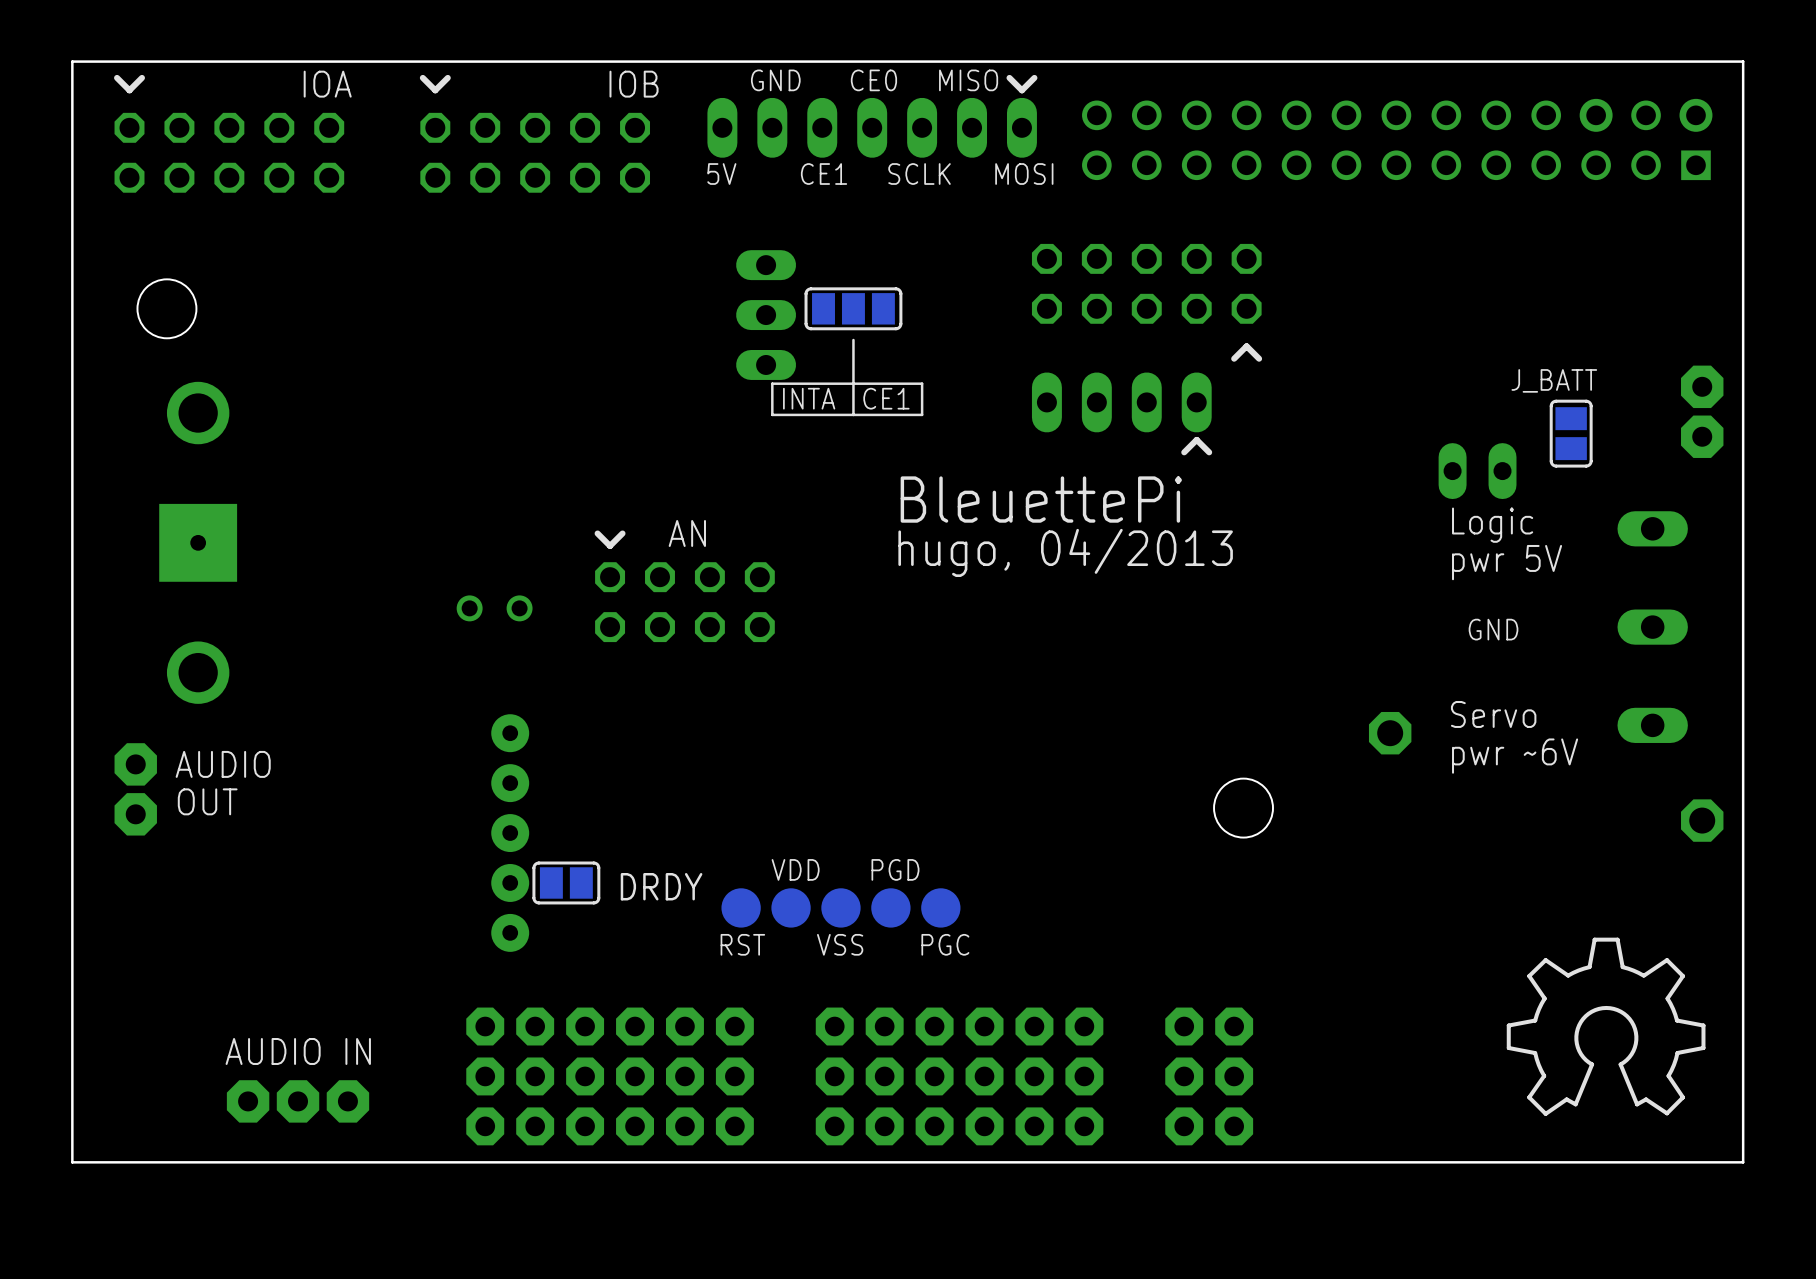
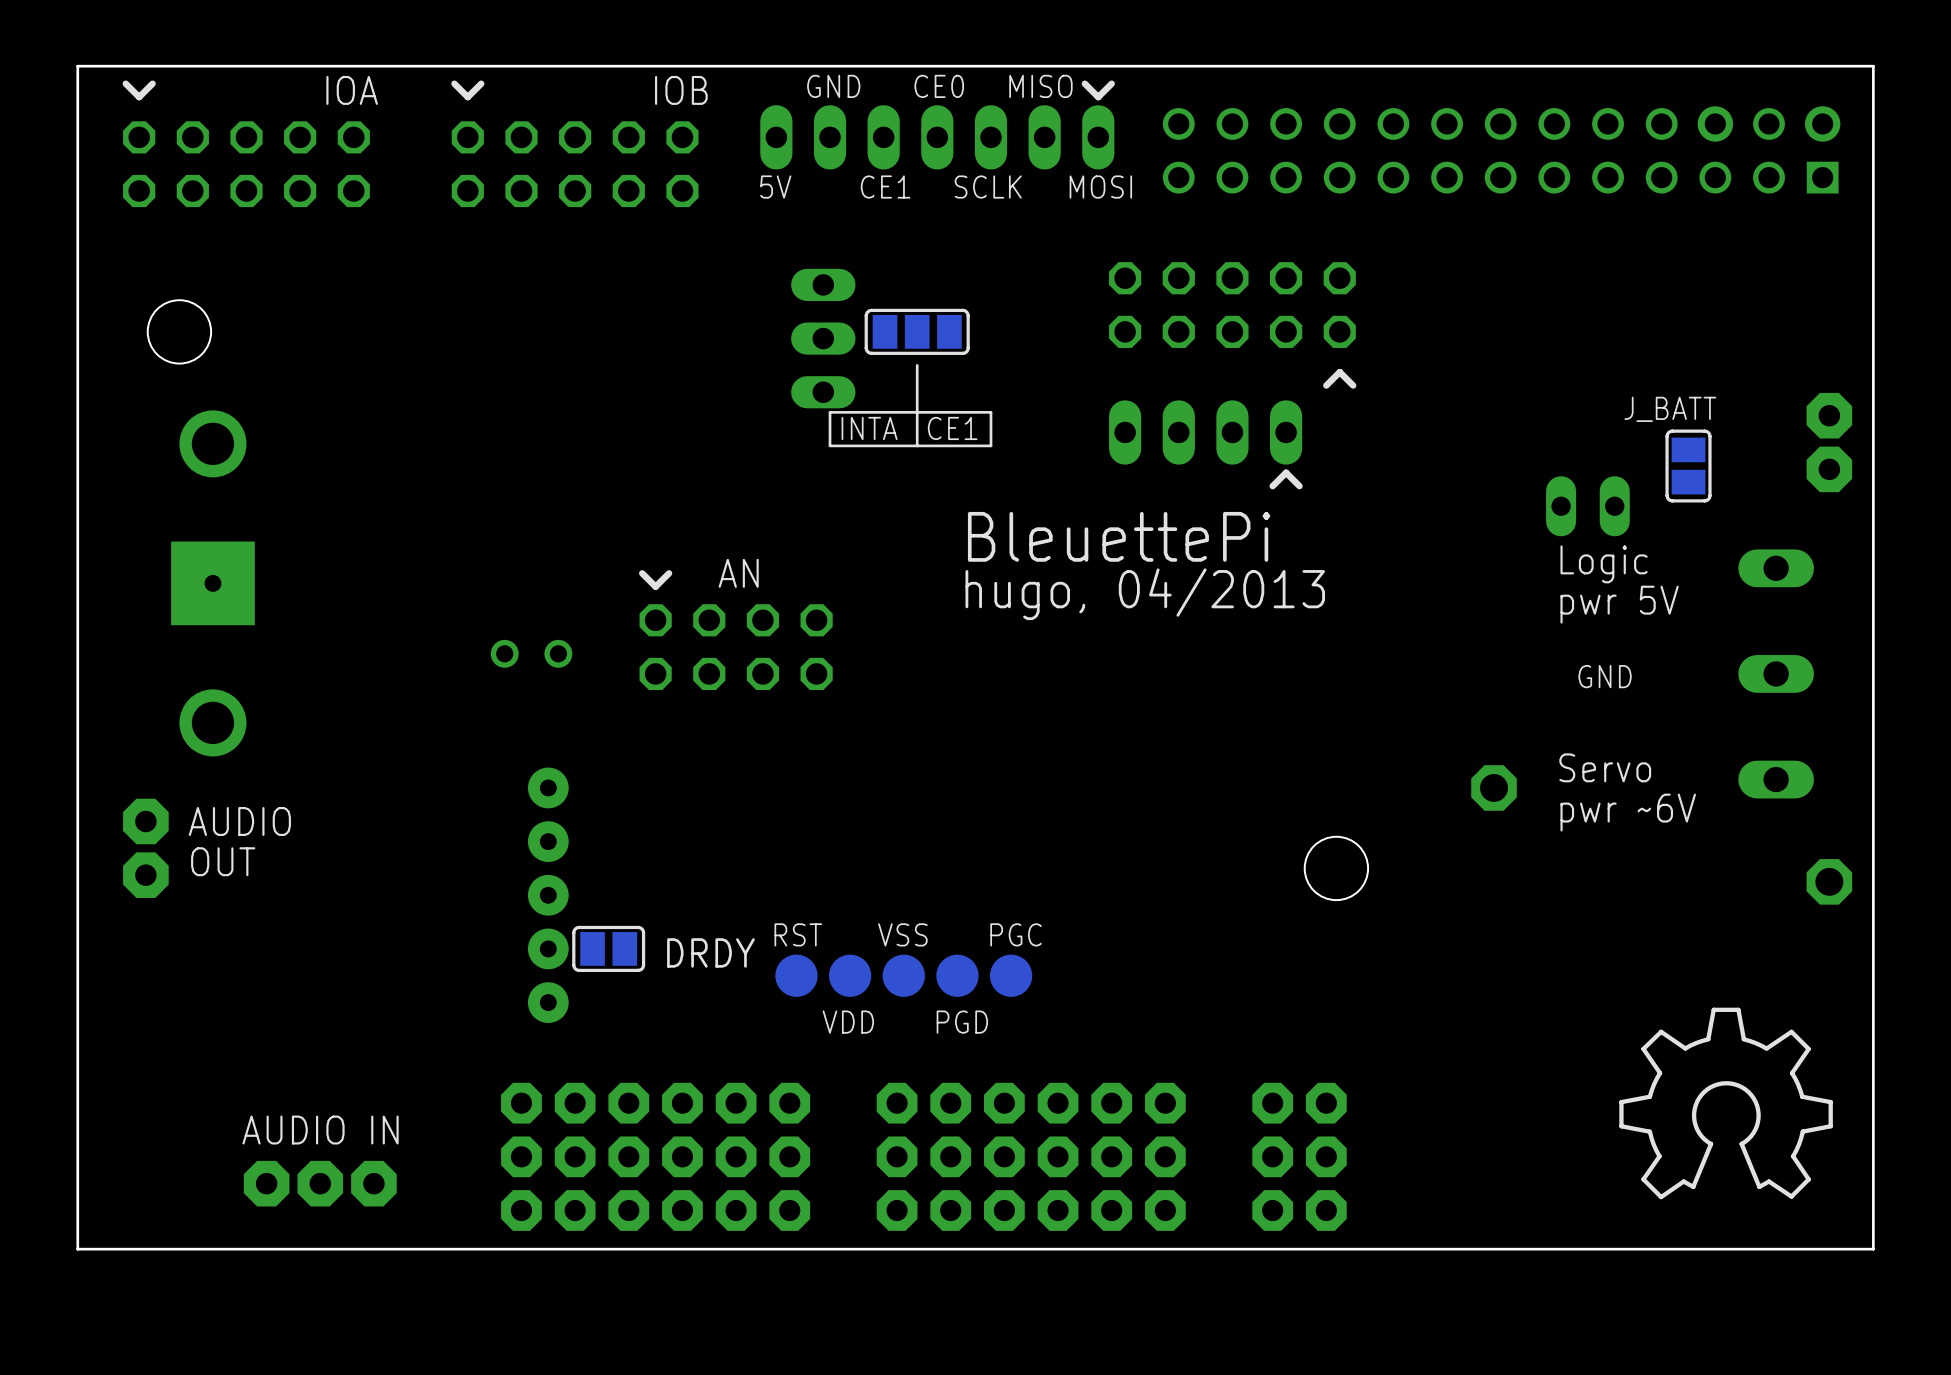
VDD name position: VDD (795, 869) -> VDD (848, 1022)
PGD name position: PGD (895, 869) -> PGD (962, 1022)
RST name position: RST (742, 944) -> RST (798, 934)
VSS name position: VSS (840, 944) -> VSS (902, 934)
PGC name position: PGC (945, 944) -> PGC (1016, 934)

